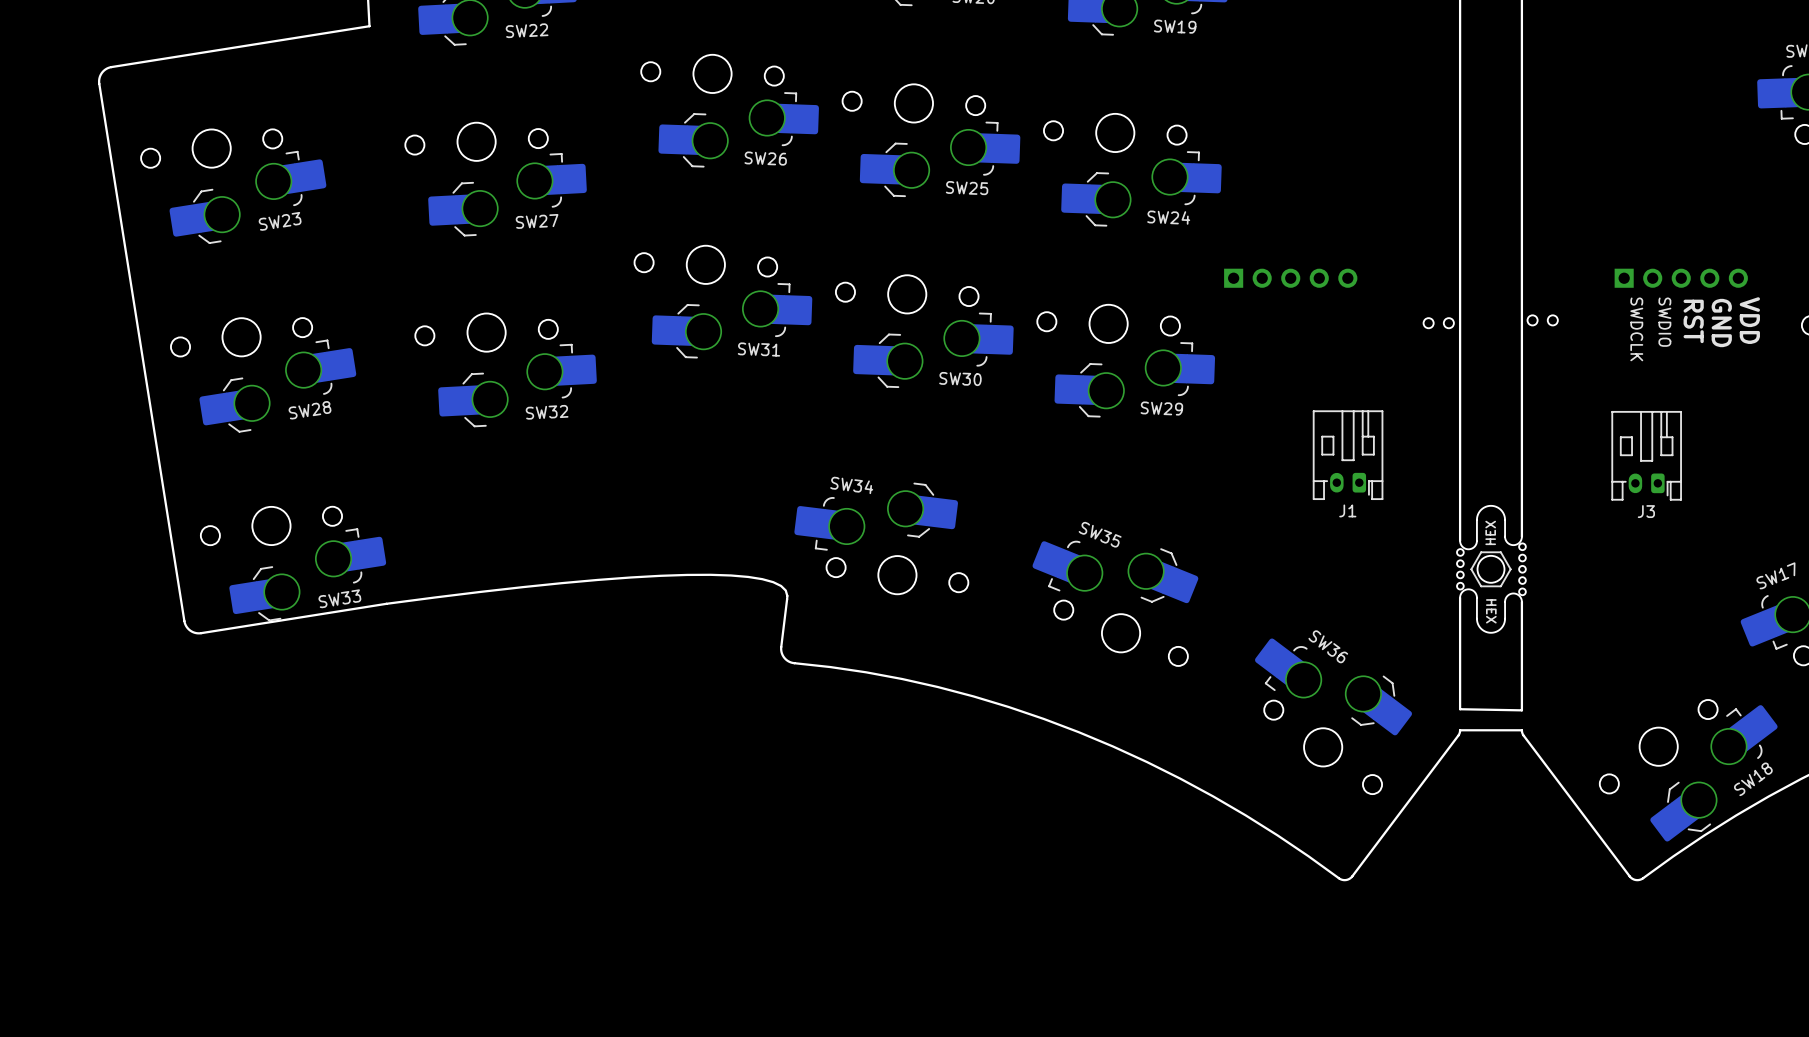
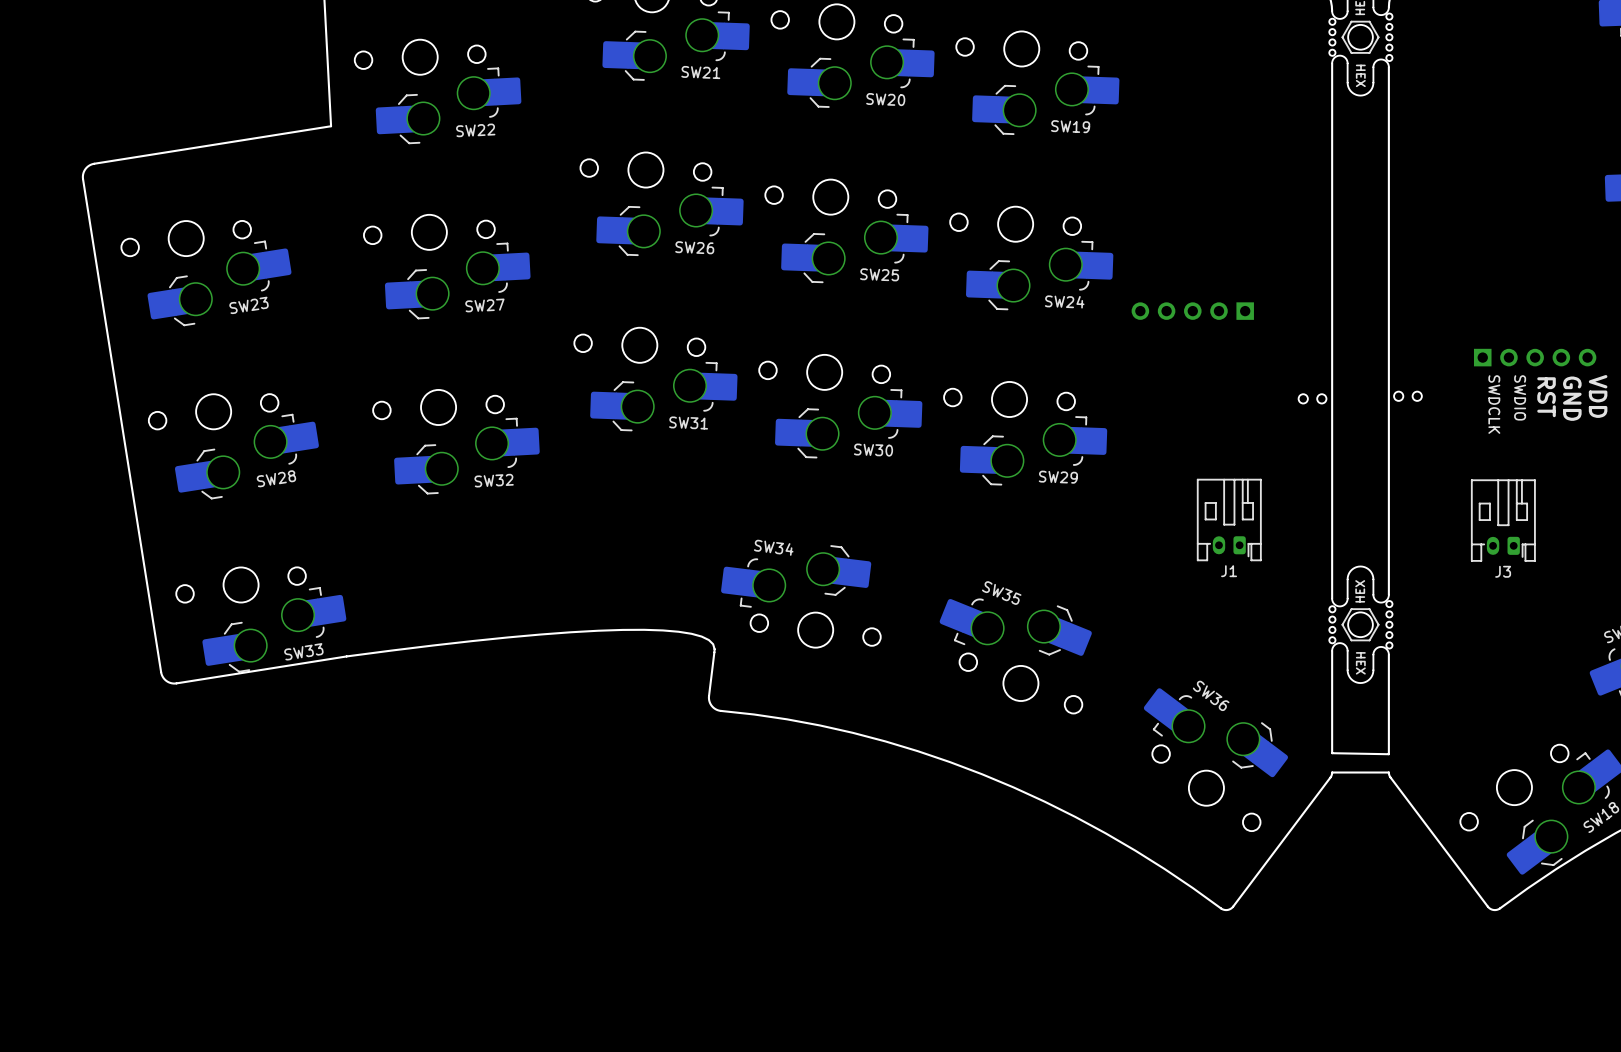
part rotation: 0° (1290, 278) -> 180° (1192, 311)

